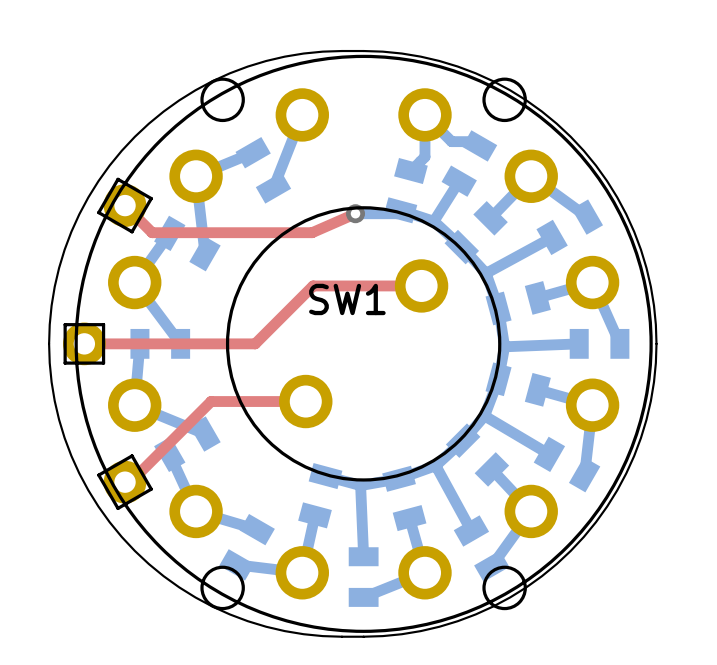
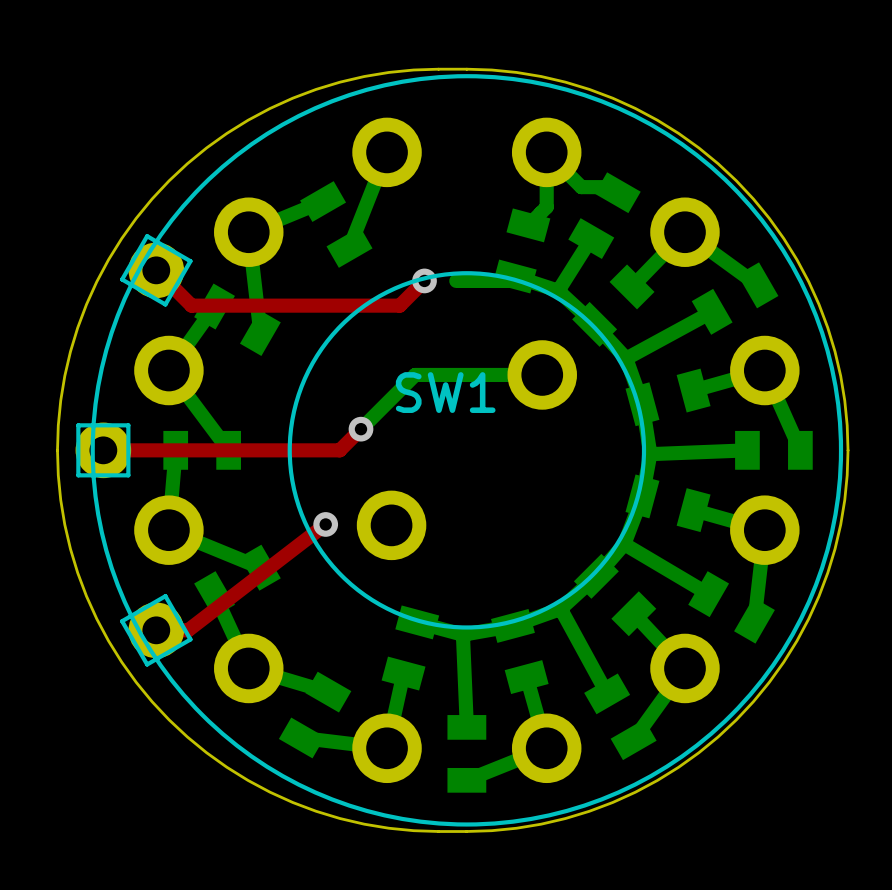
SW1 footprint: [74, 54, 653, 633] -> [90, 74, 844, 827]
top track: (355, 213) (312, 232) -> (424, 280) (399, 305)
via position: (355, 213) -> (424, 280)
bottom track: none -> (542, 374) (415, 374) (360, 429)
top track: (421, 285) (313, 285) (255, 343) -> (360, 429) (339, 450) (325, 450)
via: none -> (360, 429)
via: none -> (325, 524)
top track: (305, 401) (211, 401) (130, 482) -> (325, 524) (188, 630) (163, 630)

